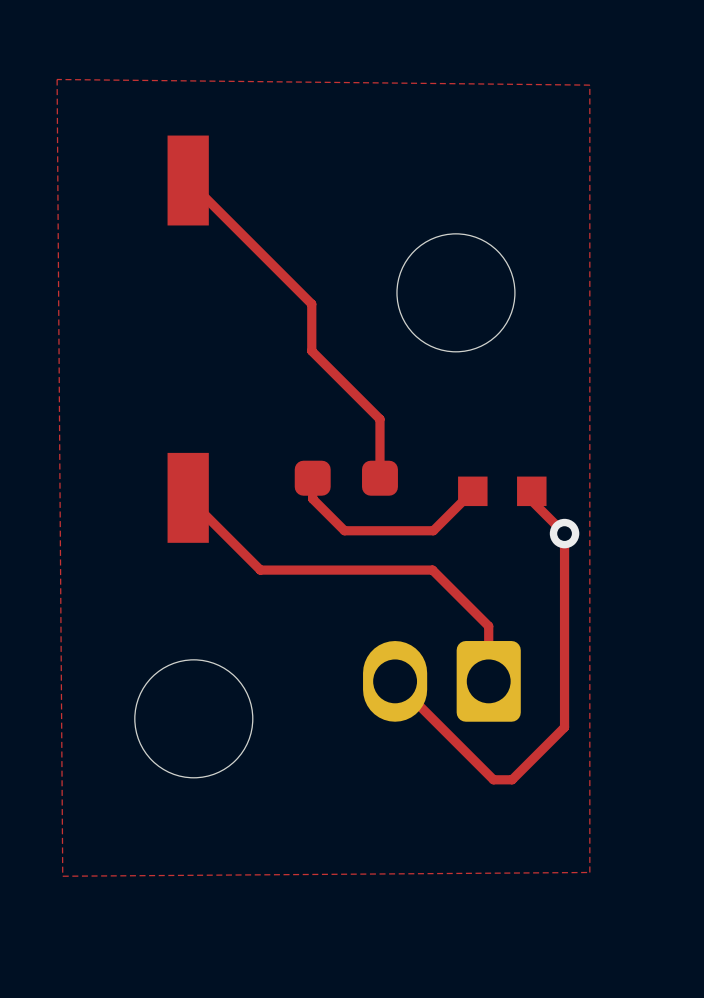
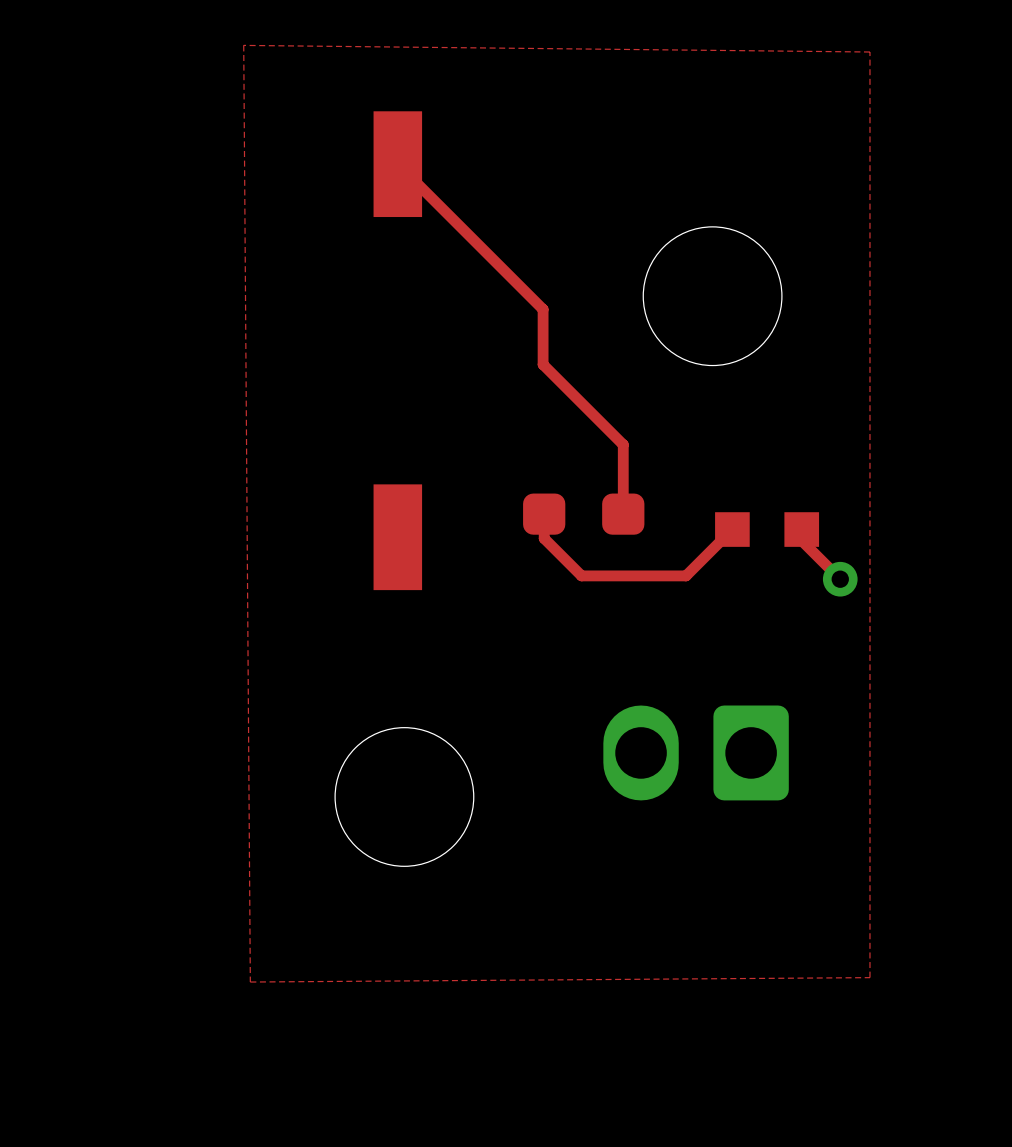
top track: (188, 497) (260, 570) (432, 570) (488, 626) (488, 681) -> none
top track: (564, 533) (564, 727) (512, 779) (493, 779) (395, 681) -> none

